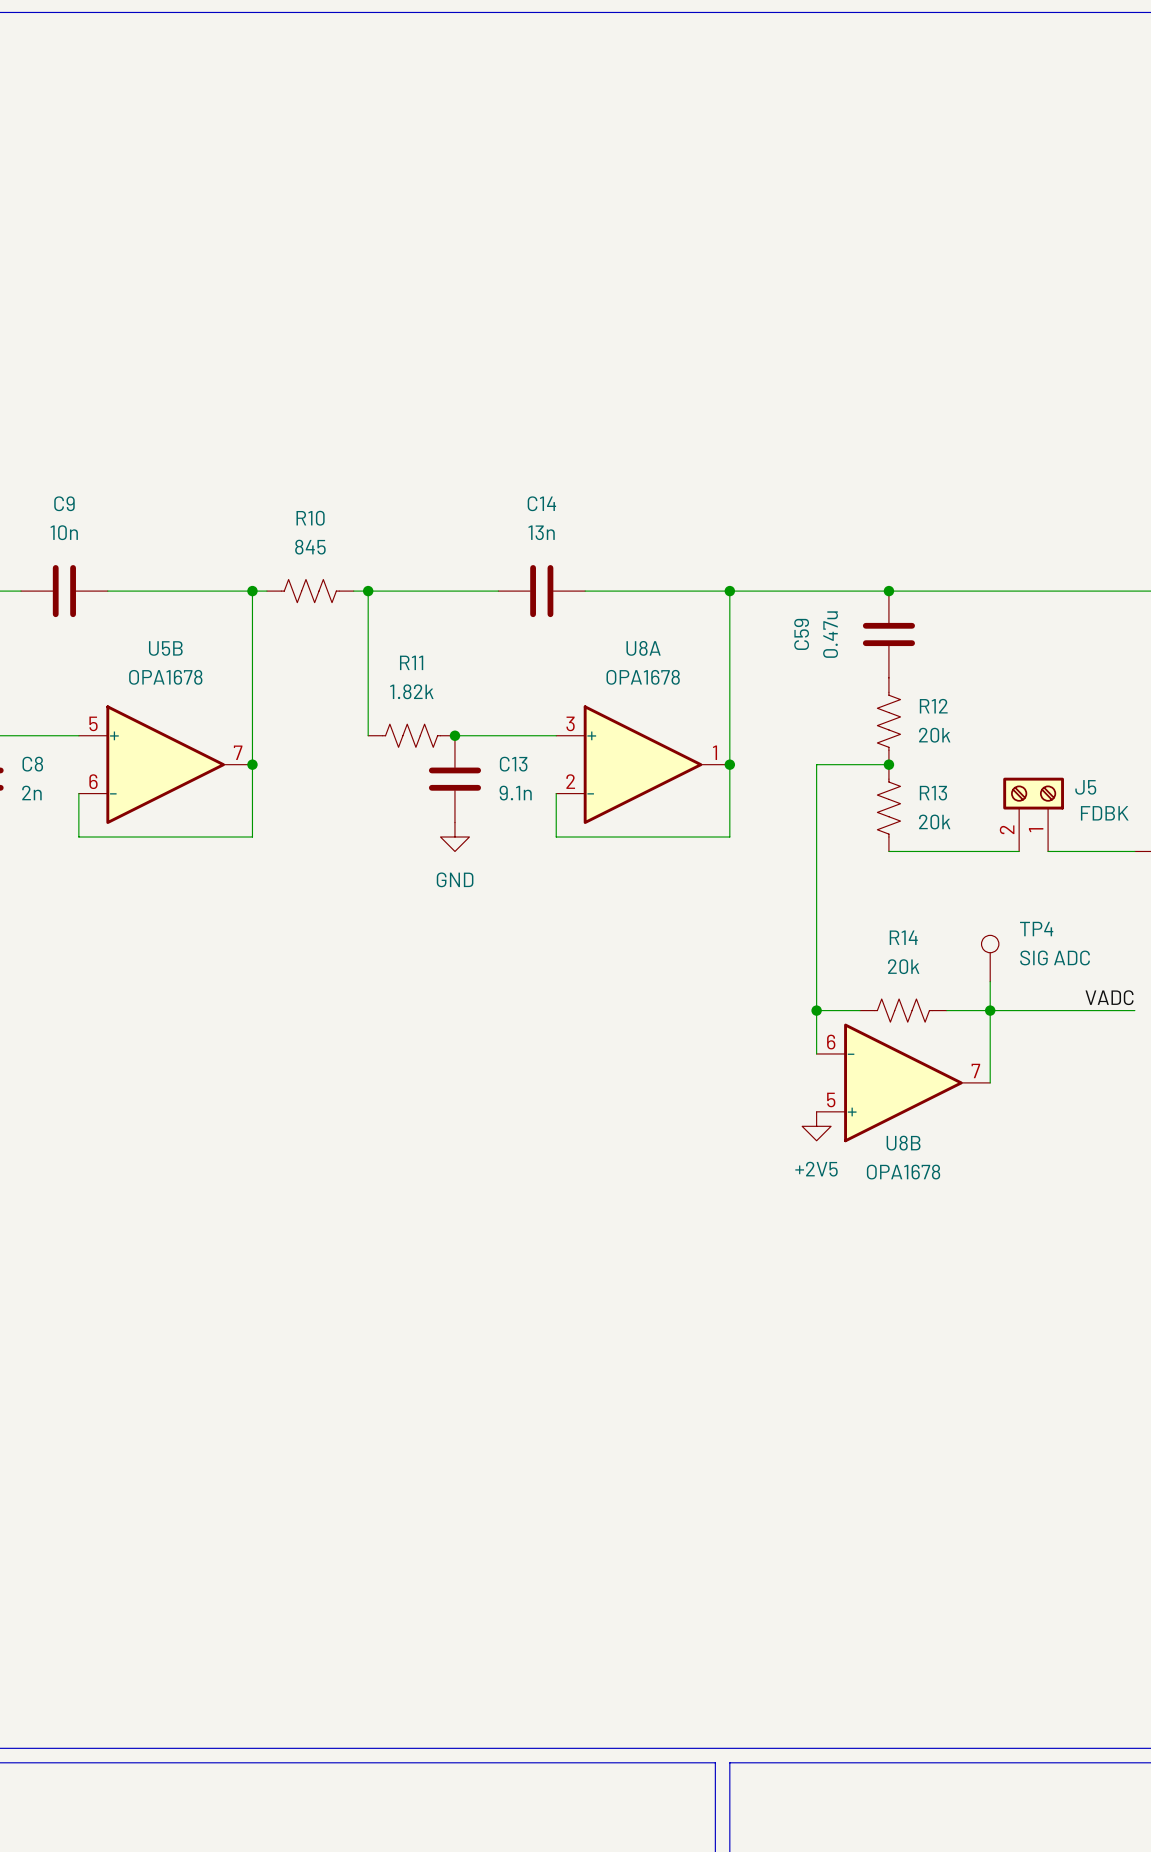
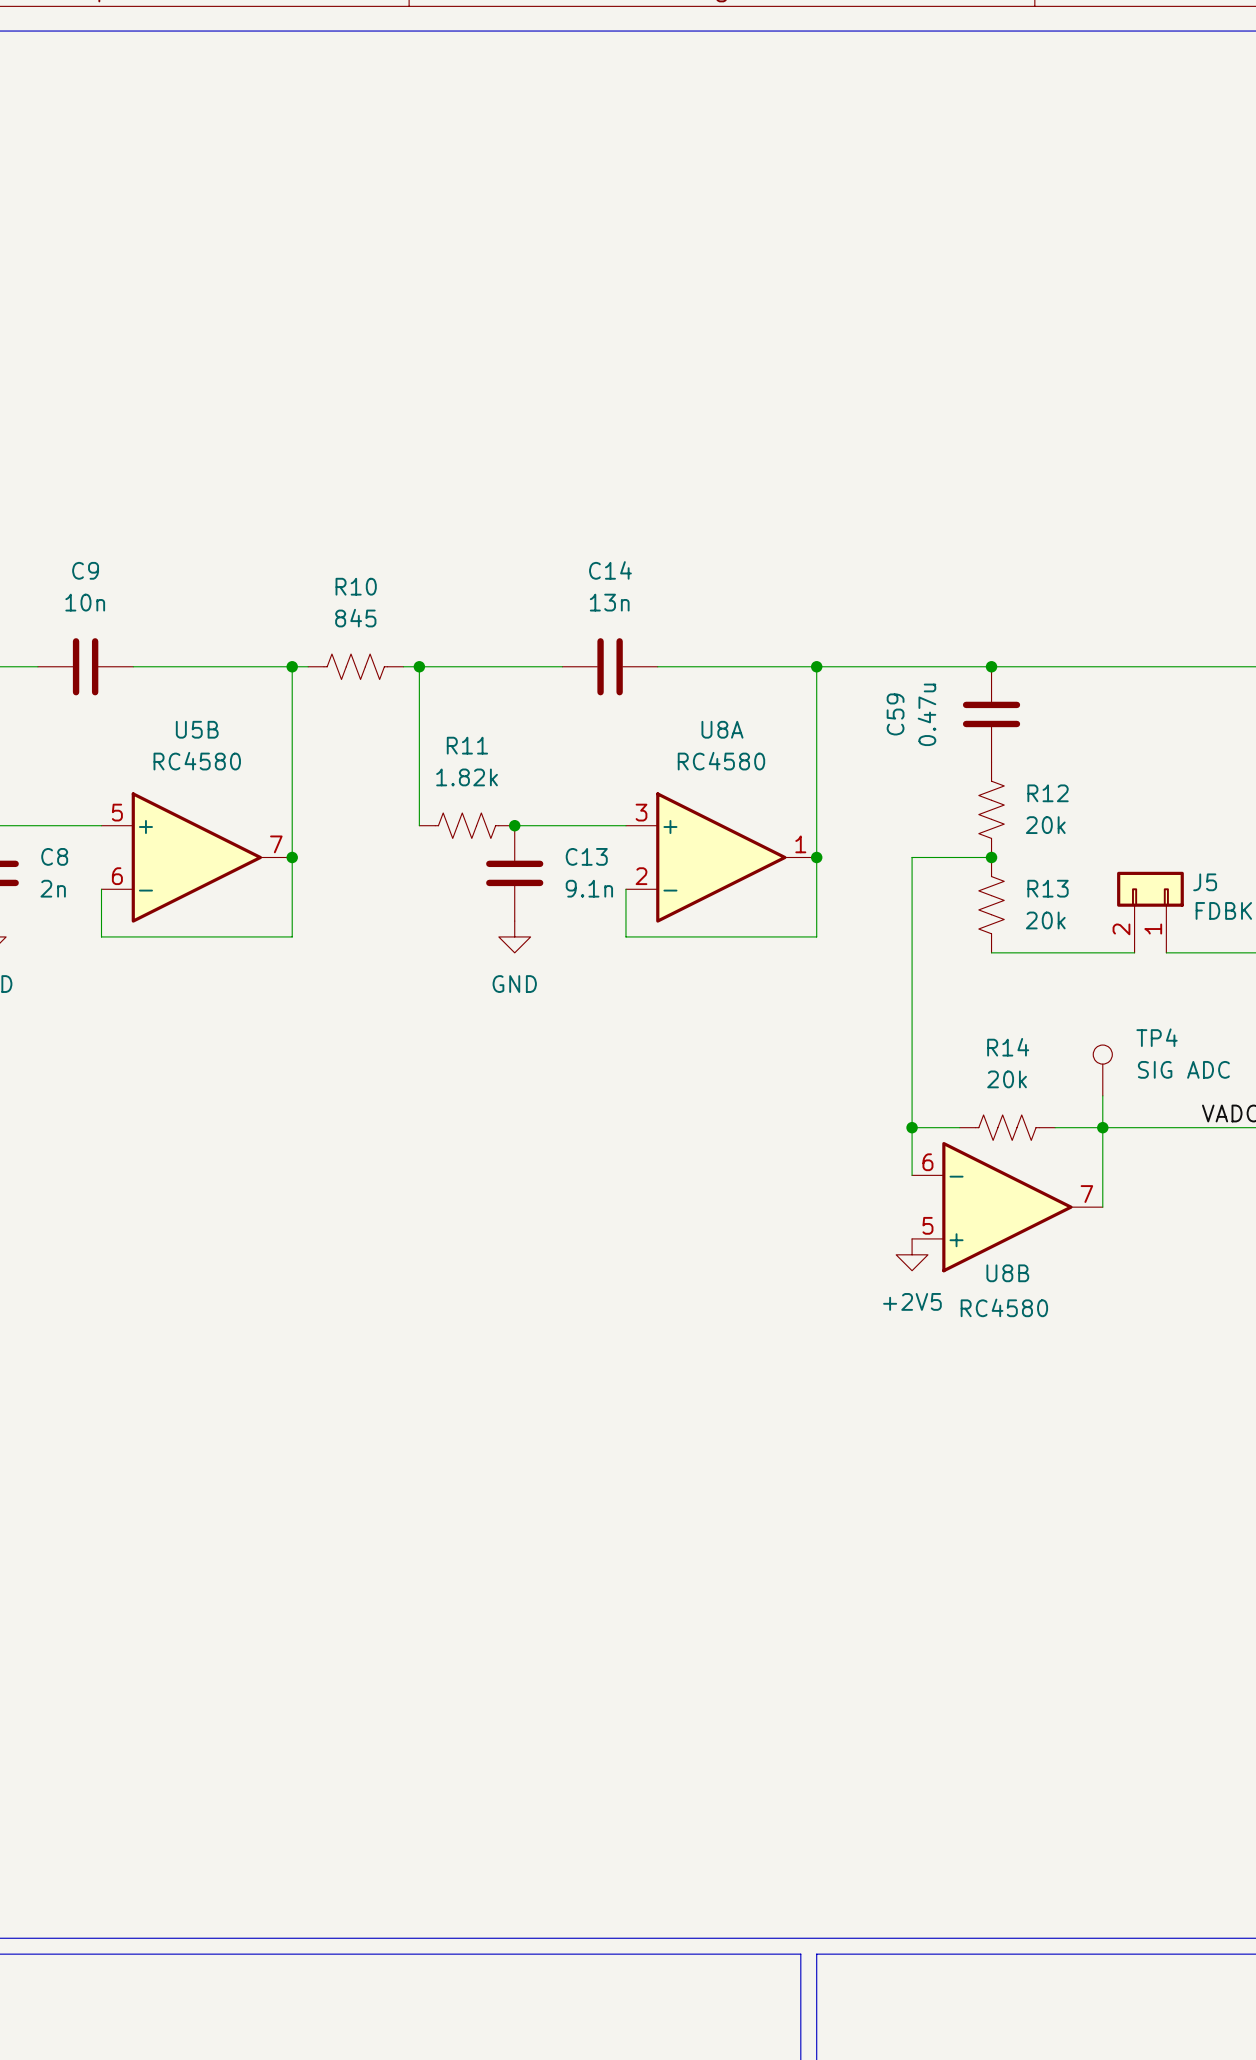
U5B value: OPA1678 (165, 677) -> RC4580 (197, 761)
U8A value: OPA1678 (643, 677) -> RC4580 (721, 761)
J5 symbol: [1003, 777, 1064, 852] -> [1117, 871, 1184, 953]
U8B value: OPA1678 (903, 1172) -> RC4580 (1004, 1307)

